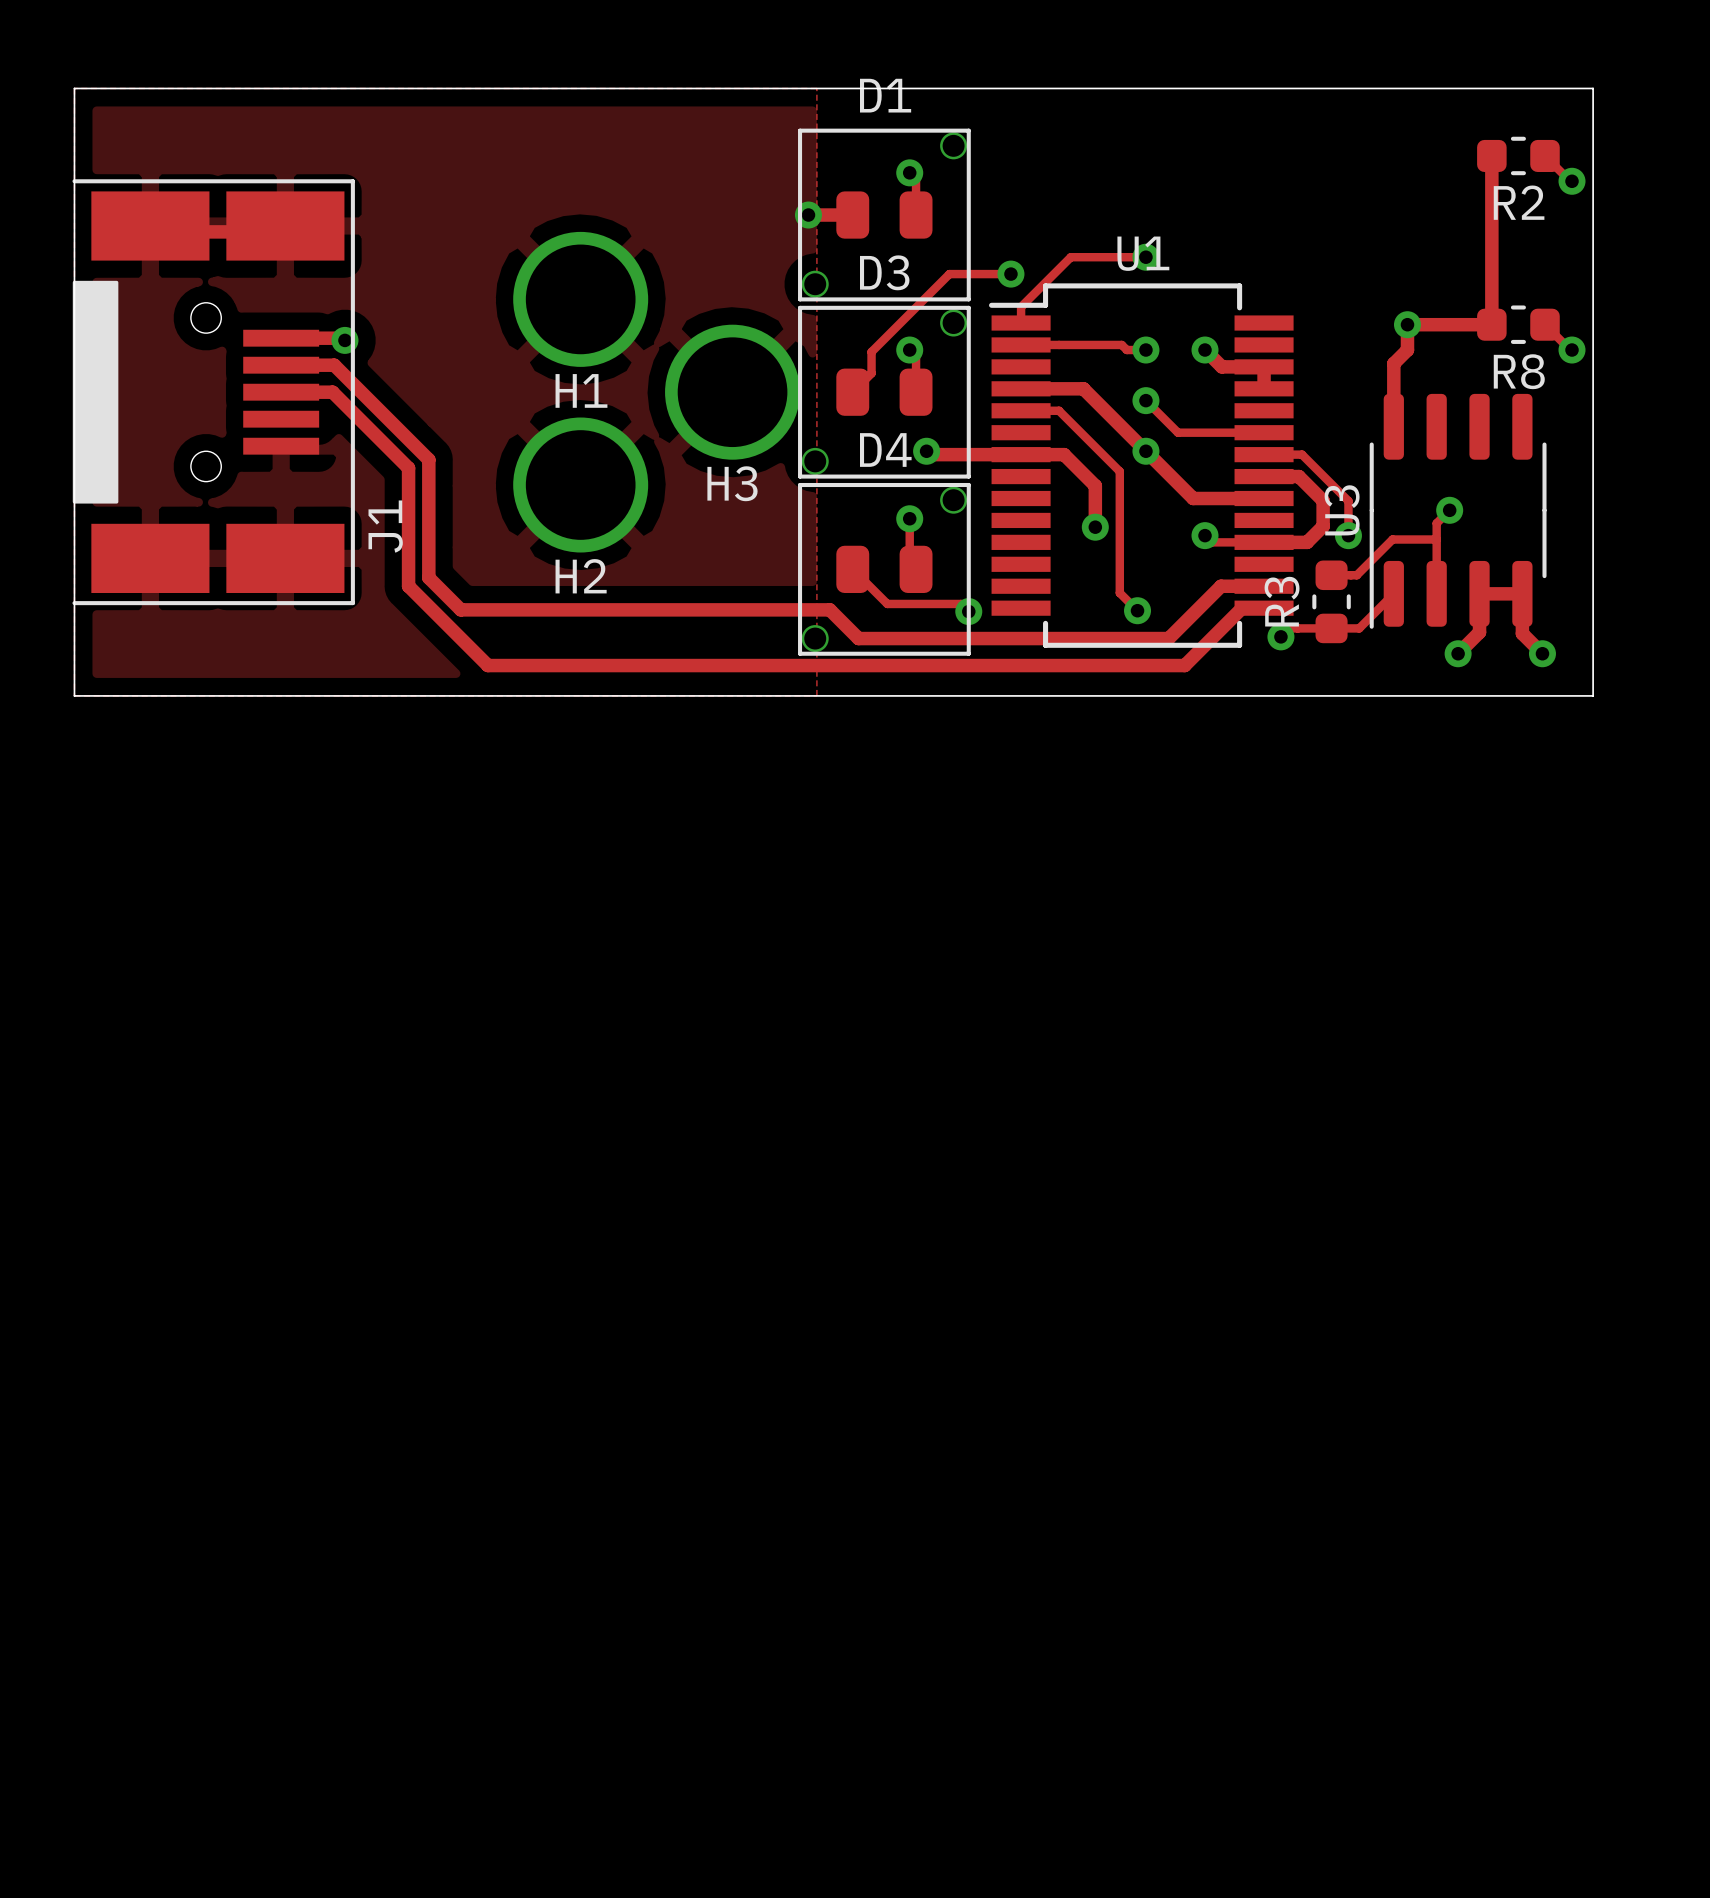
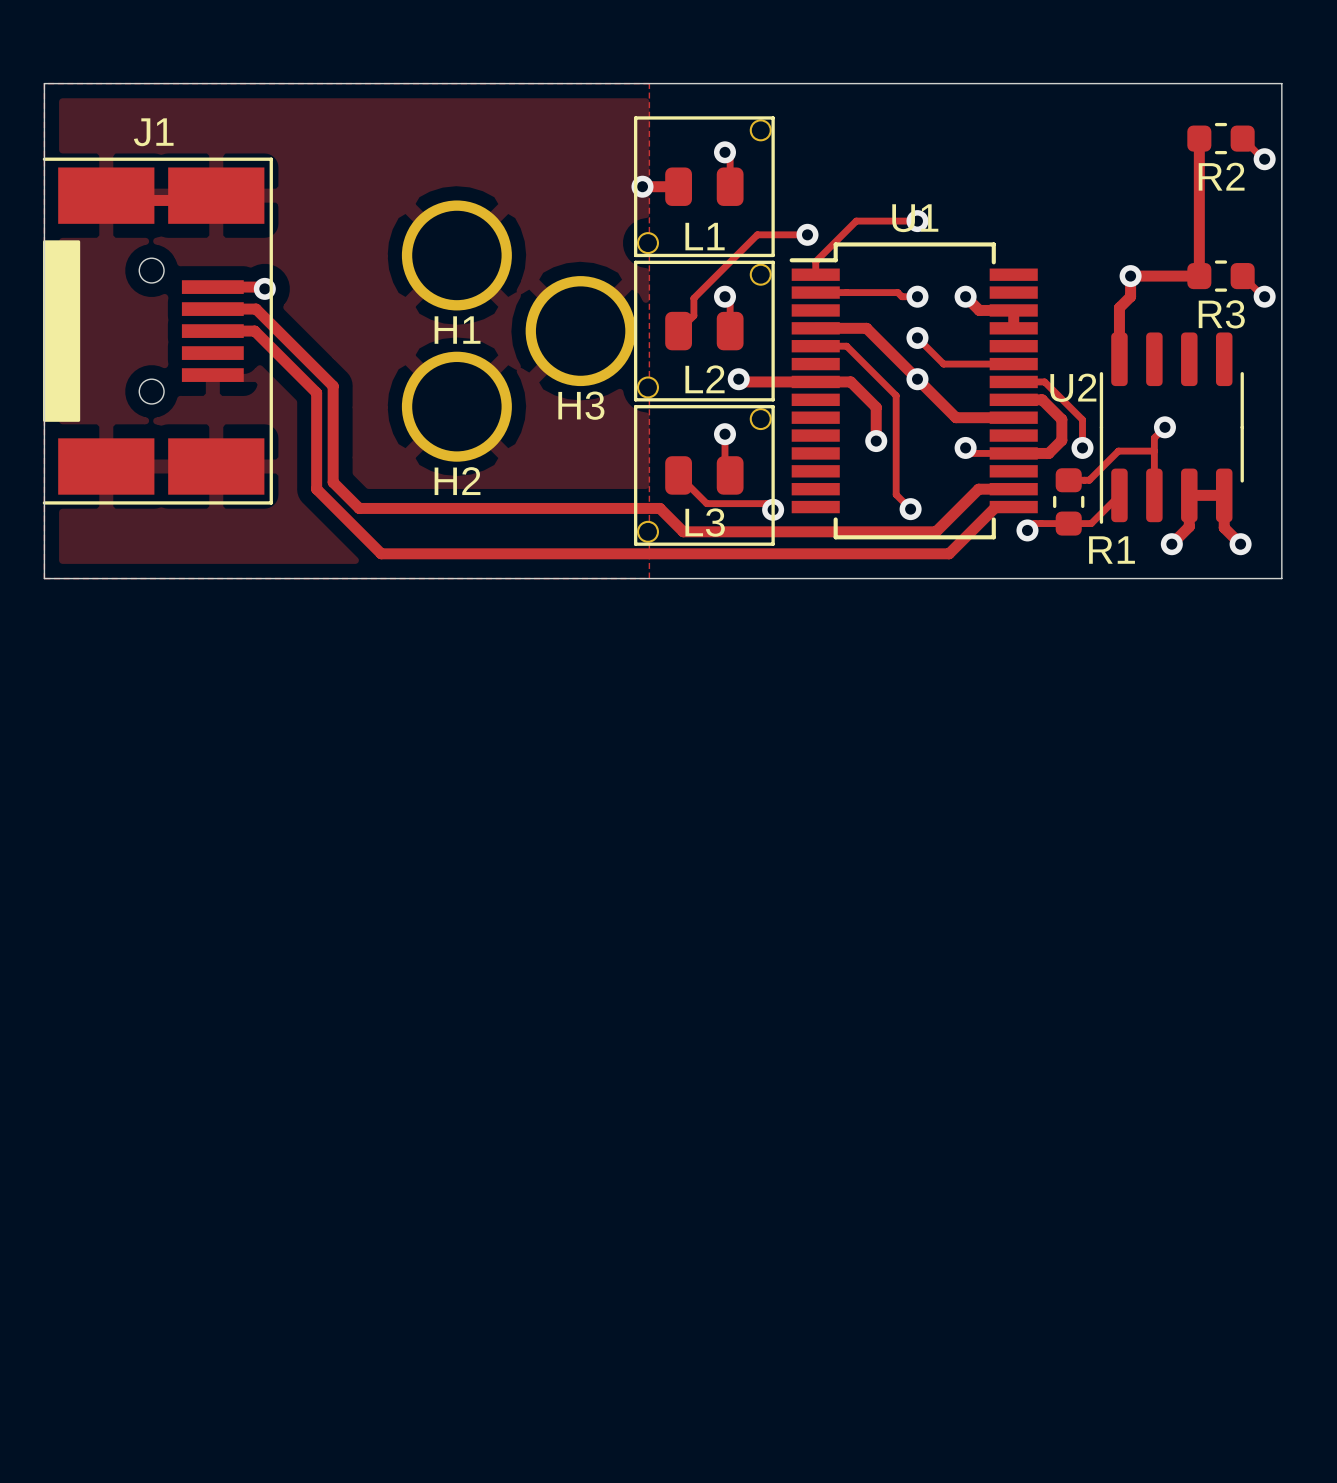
D1 name: D1 (885, 95) -> L1 (705, 236)
D3 name: D3 (884, 272) -> L2 (705, 379)
R8 name: R8 (1519, 371) -> R3 (1221, 314)
D4 name: D4 (885, 449) -> L3 (705, 522)
U3 name: U3 (1342, 510) -> U2 (1073, 387)
J1 name rotation: 0° (385, 526) -> 90° clockwise (153, 132)
J1 name position: J1 (385, 526) -> J1 (153, 132)
R3 name: R3 (1282, 601) -> R1 (1112, 550)

